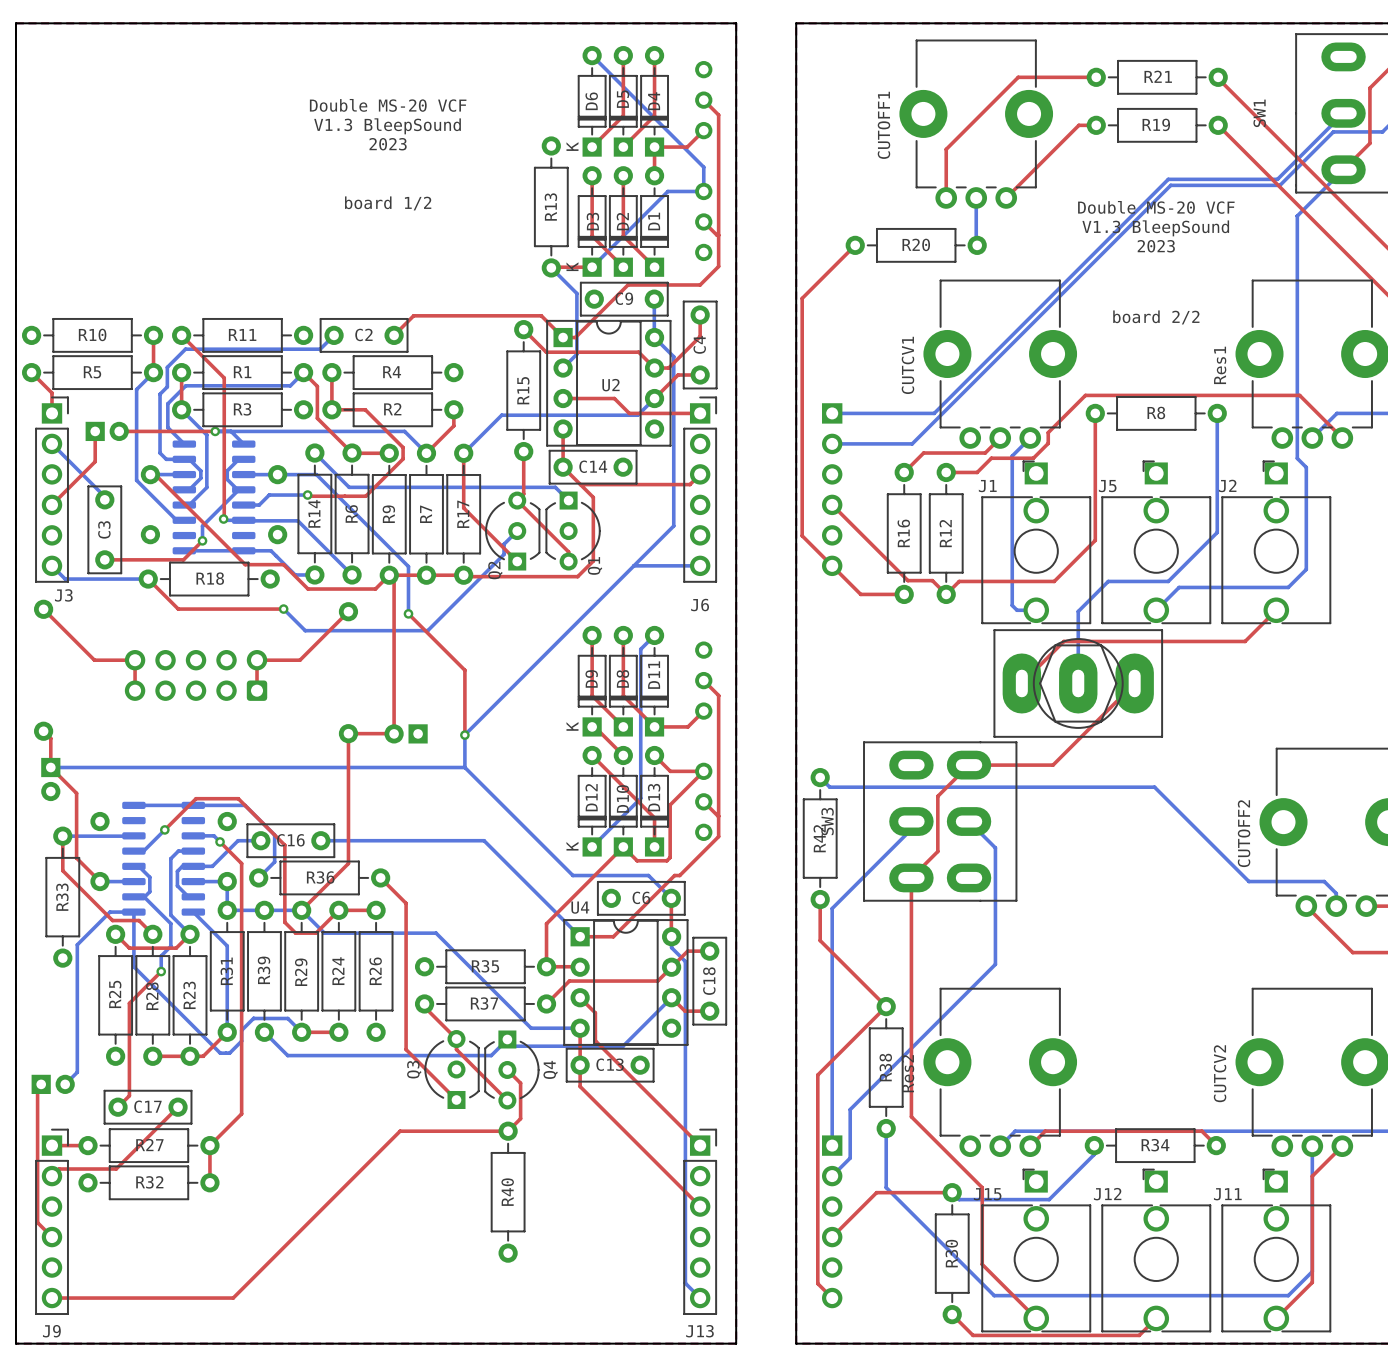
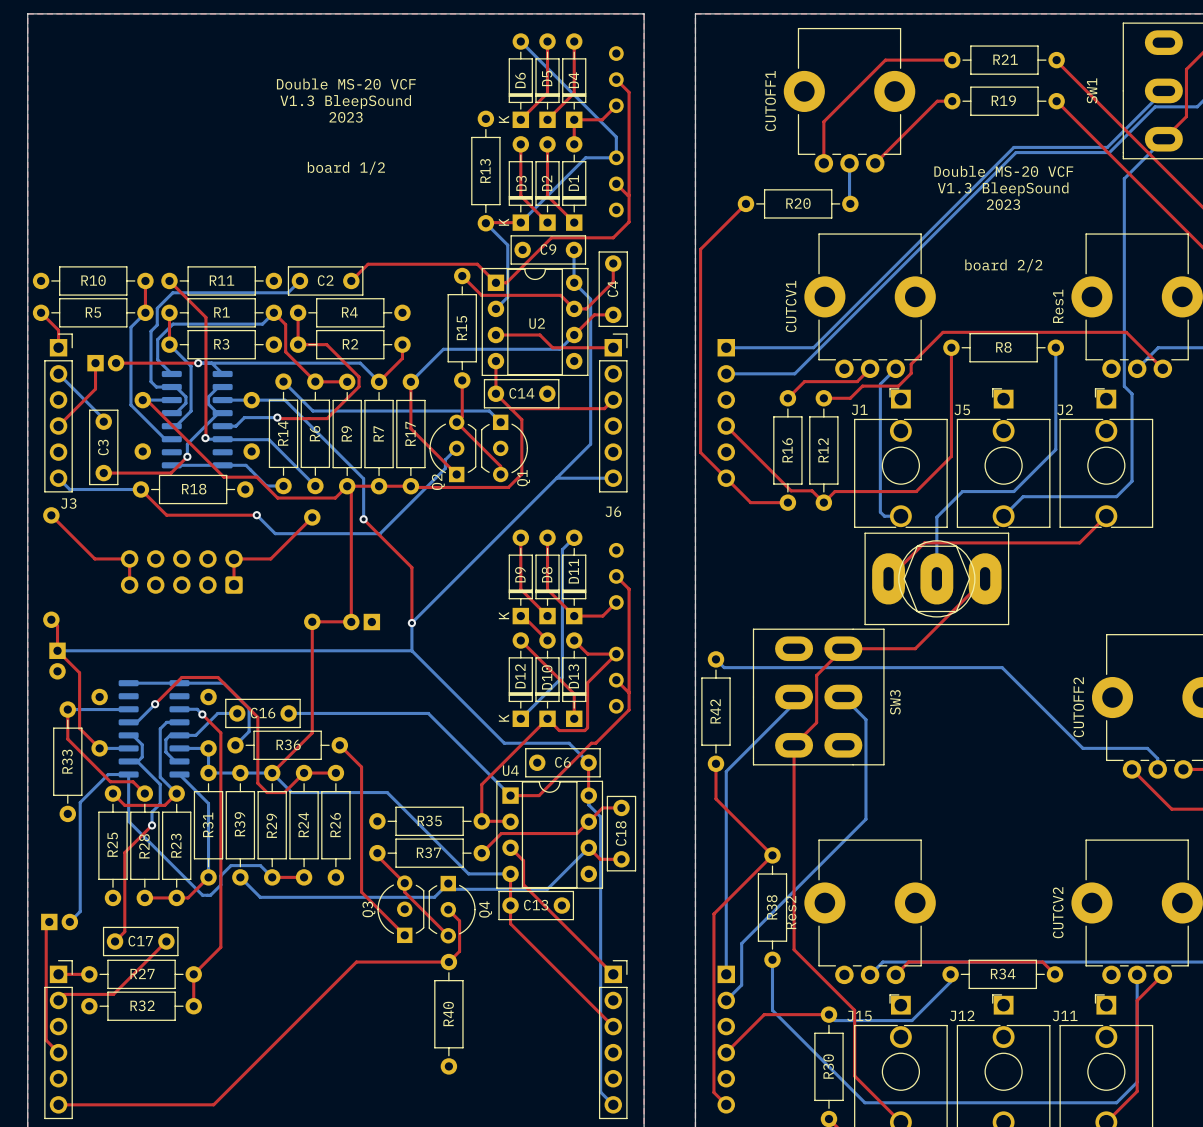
SW3 name position: SW3 (827, 821) -> SW3 (895, 702)

